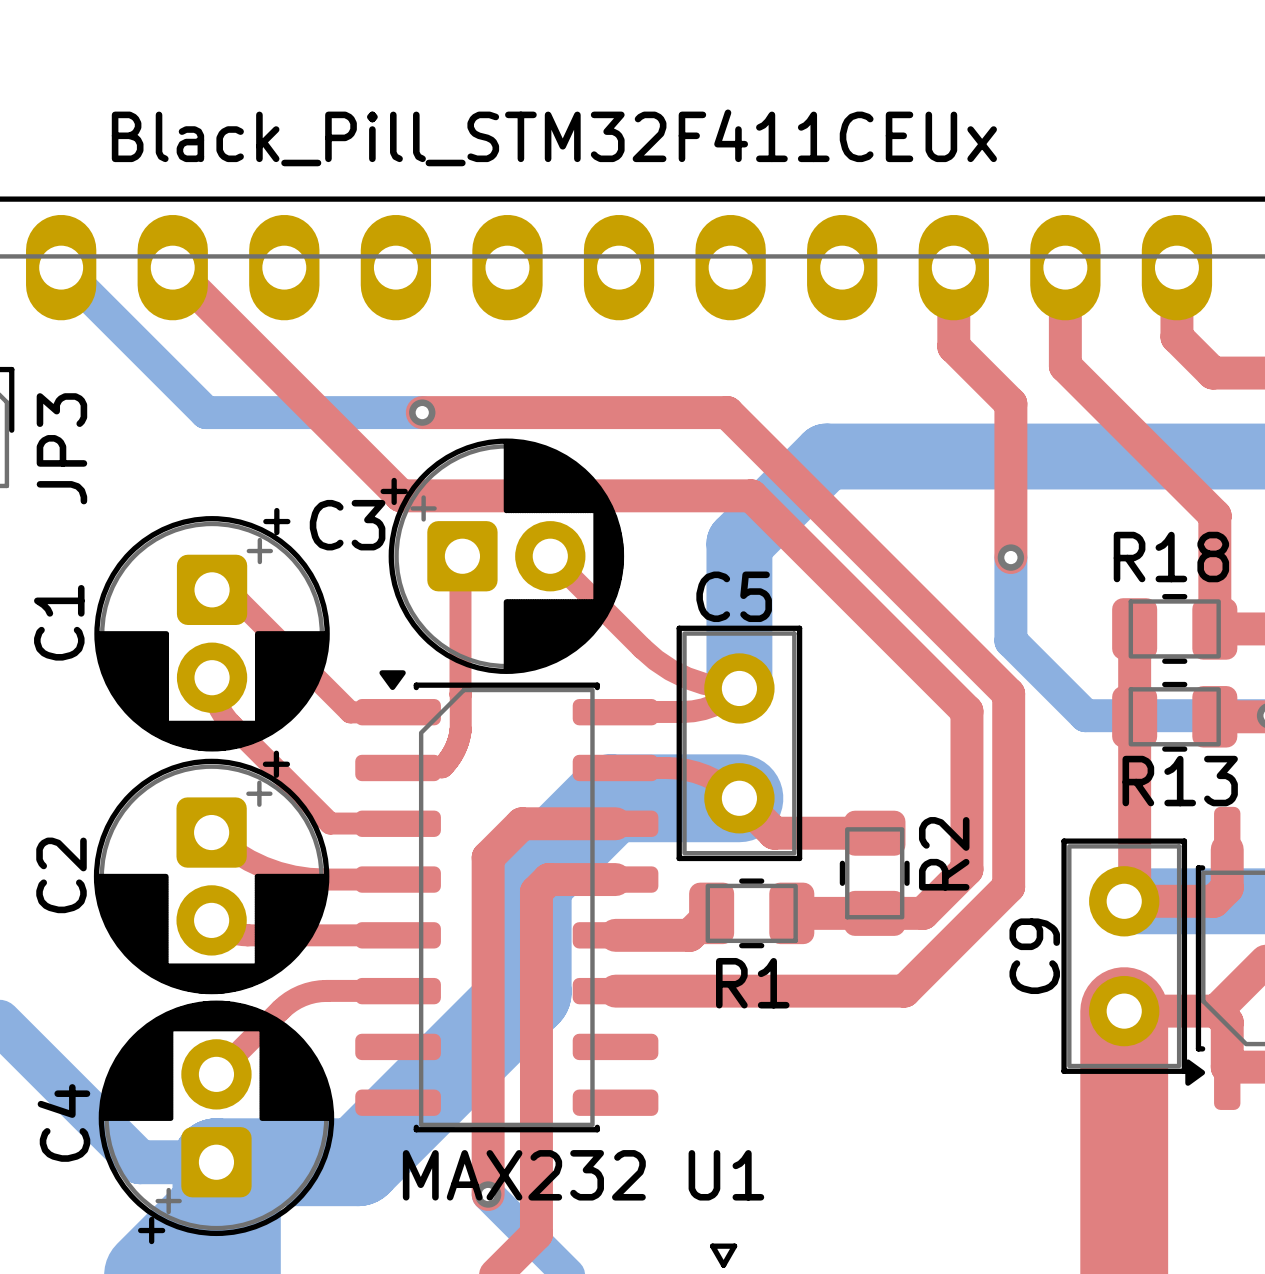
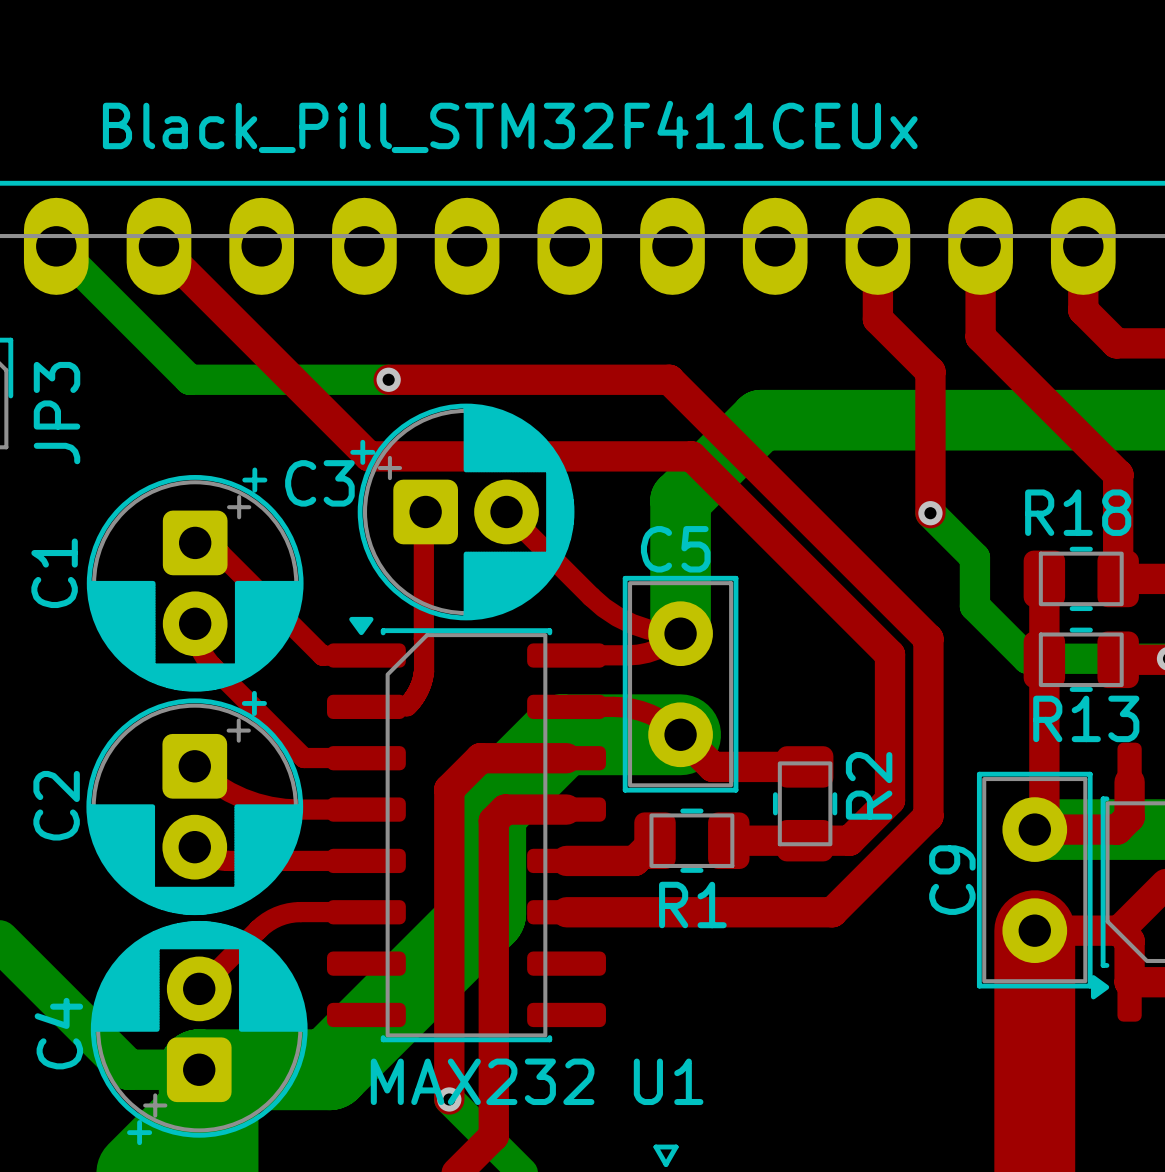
bottom track: (1010, 557) (1010, 641) (1085, 715) (1116, 715) -> (930, 513) (974, 557) (974, 606) (1027, 658)

